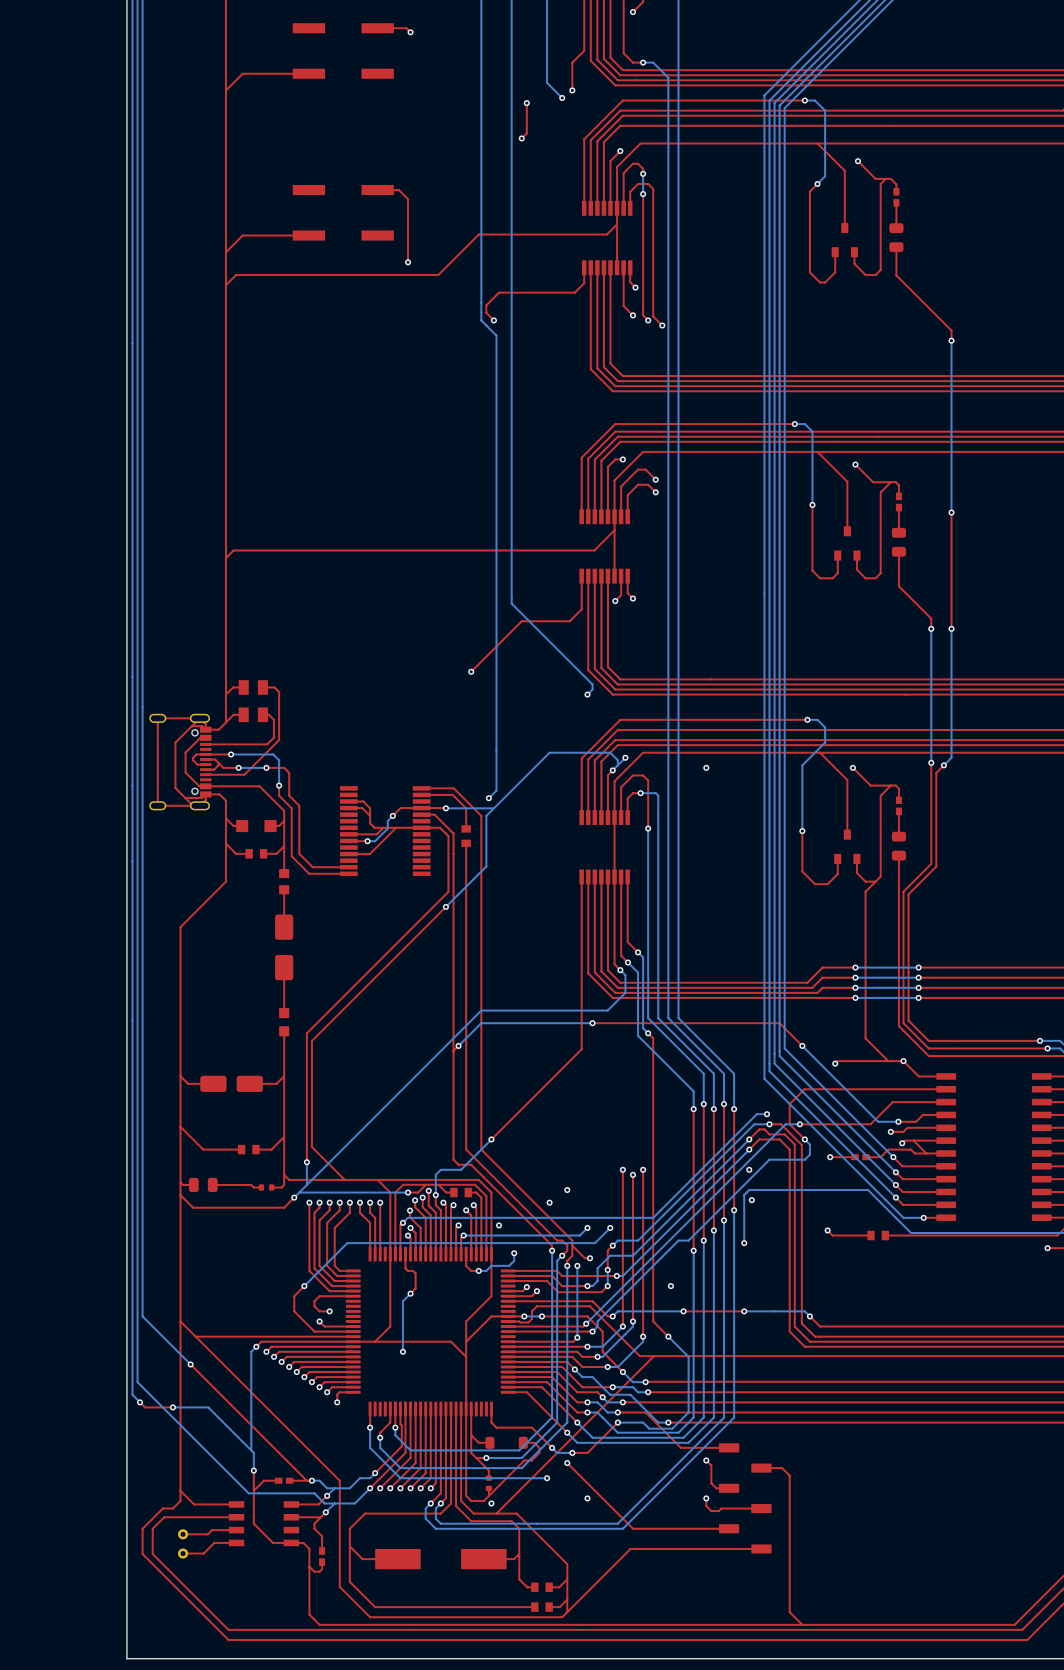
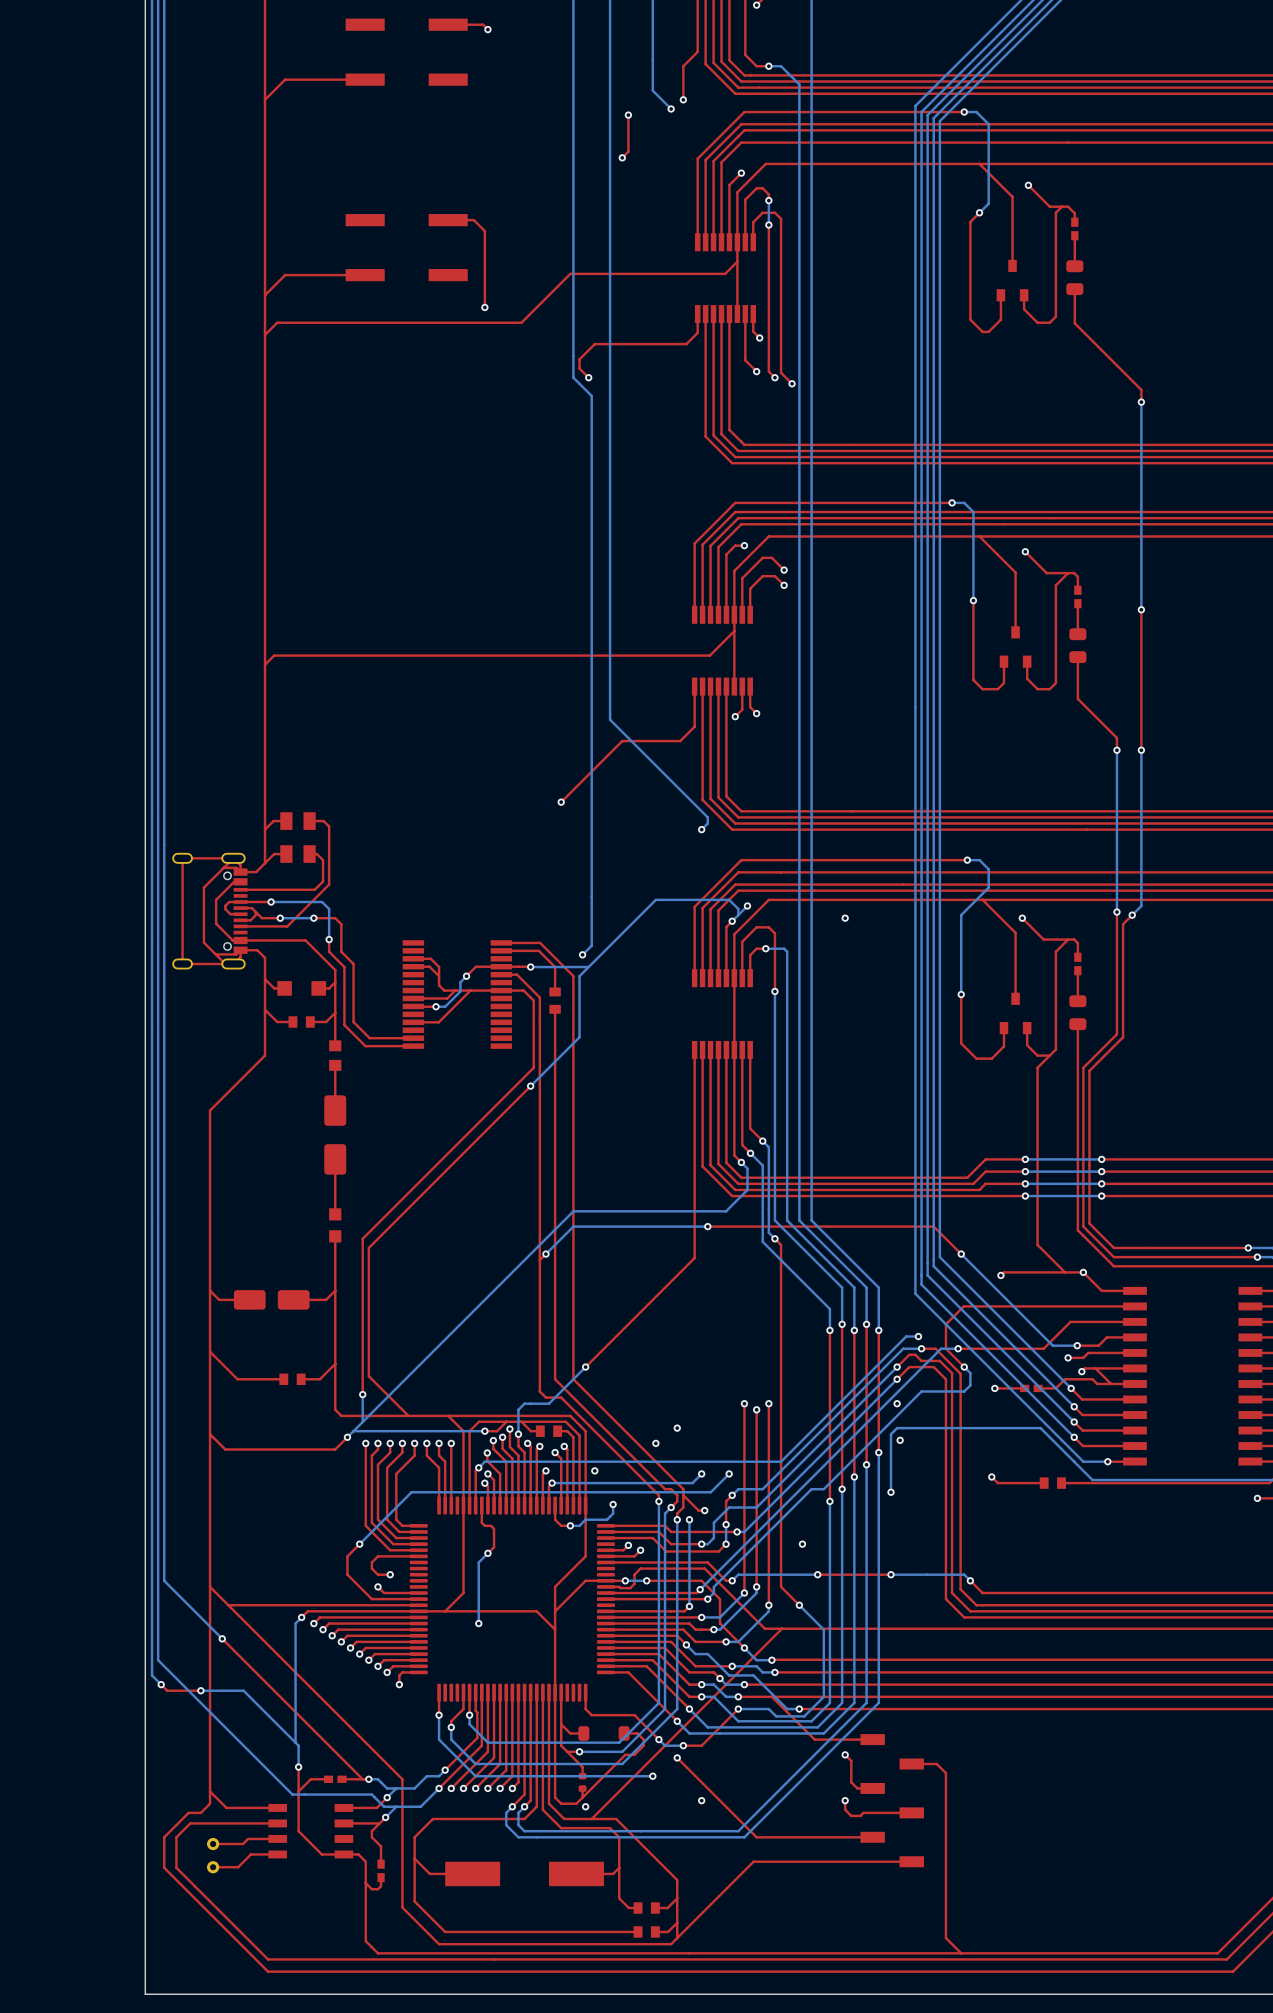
top track: (284, 1174) (284, 1184) (281, 1187) (271, 1187) -> none
top track: (180, 1182) (183, 1184) (193, 1184) -> none
part: (203, 1184) -> none
top track: (212, 1184) (251, 1184) (253, 1187) (261, 1187) -> none
part: (266, 1187) -> none

